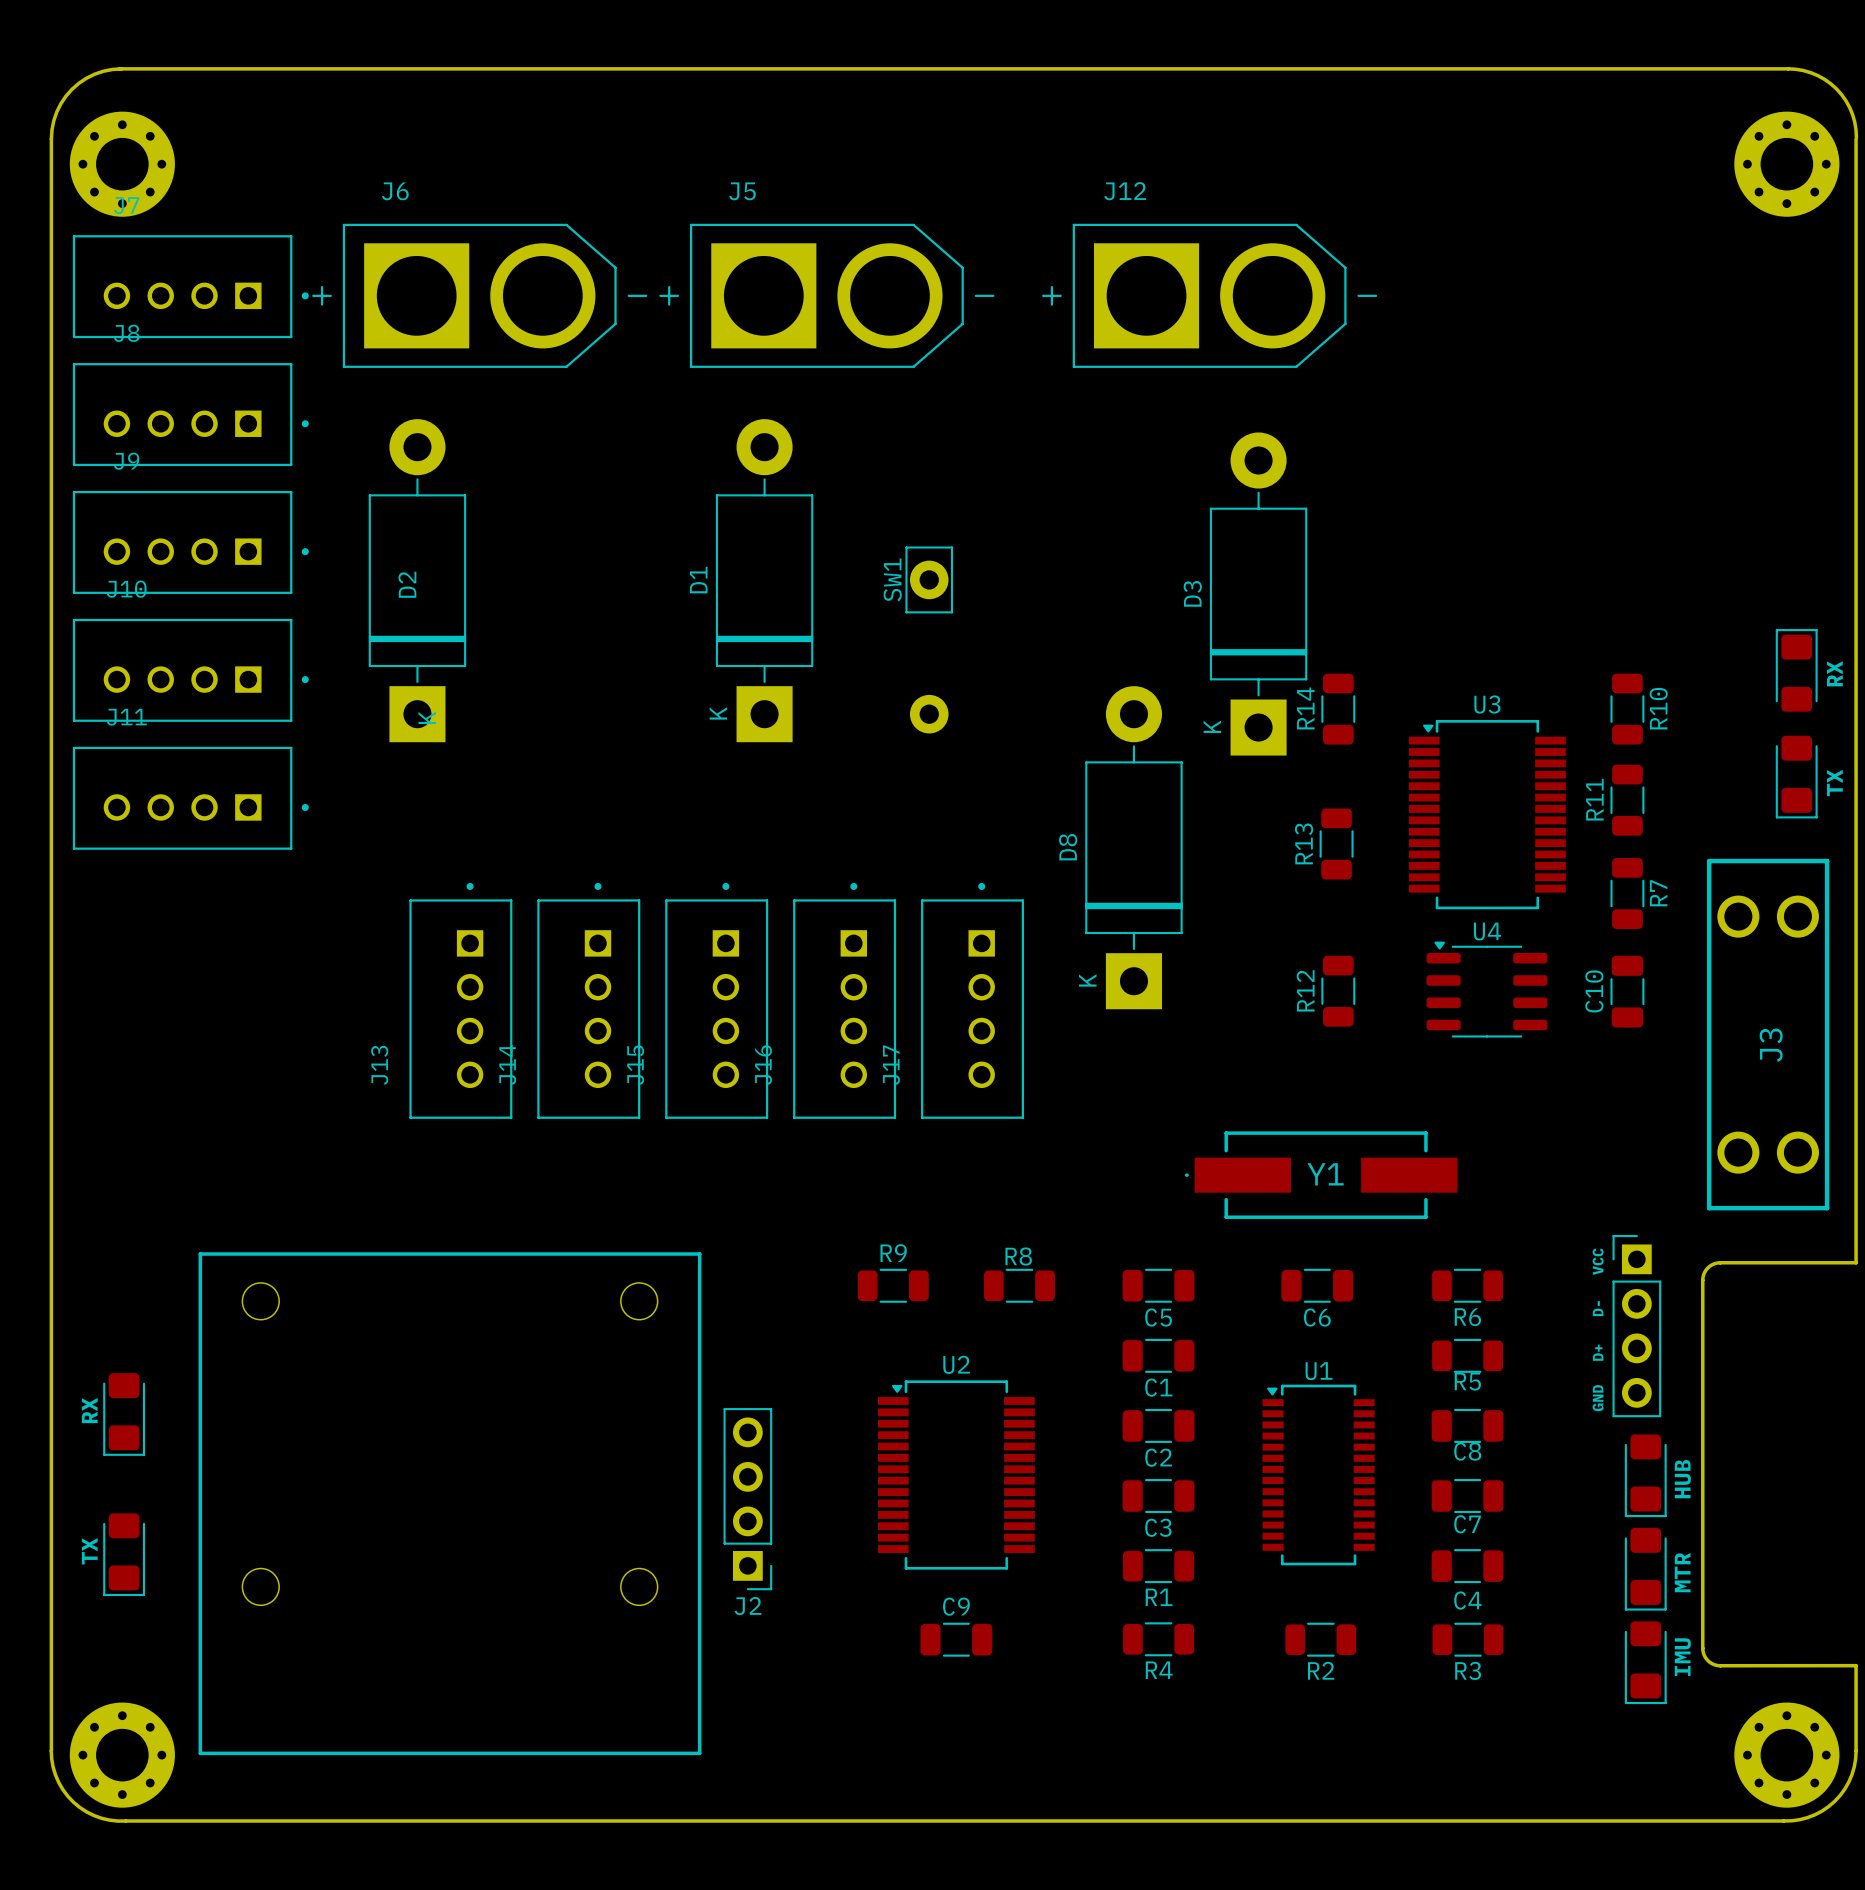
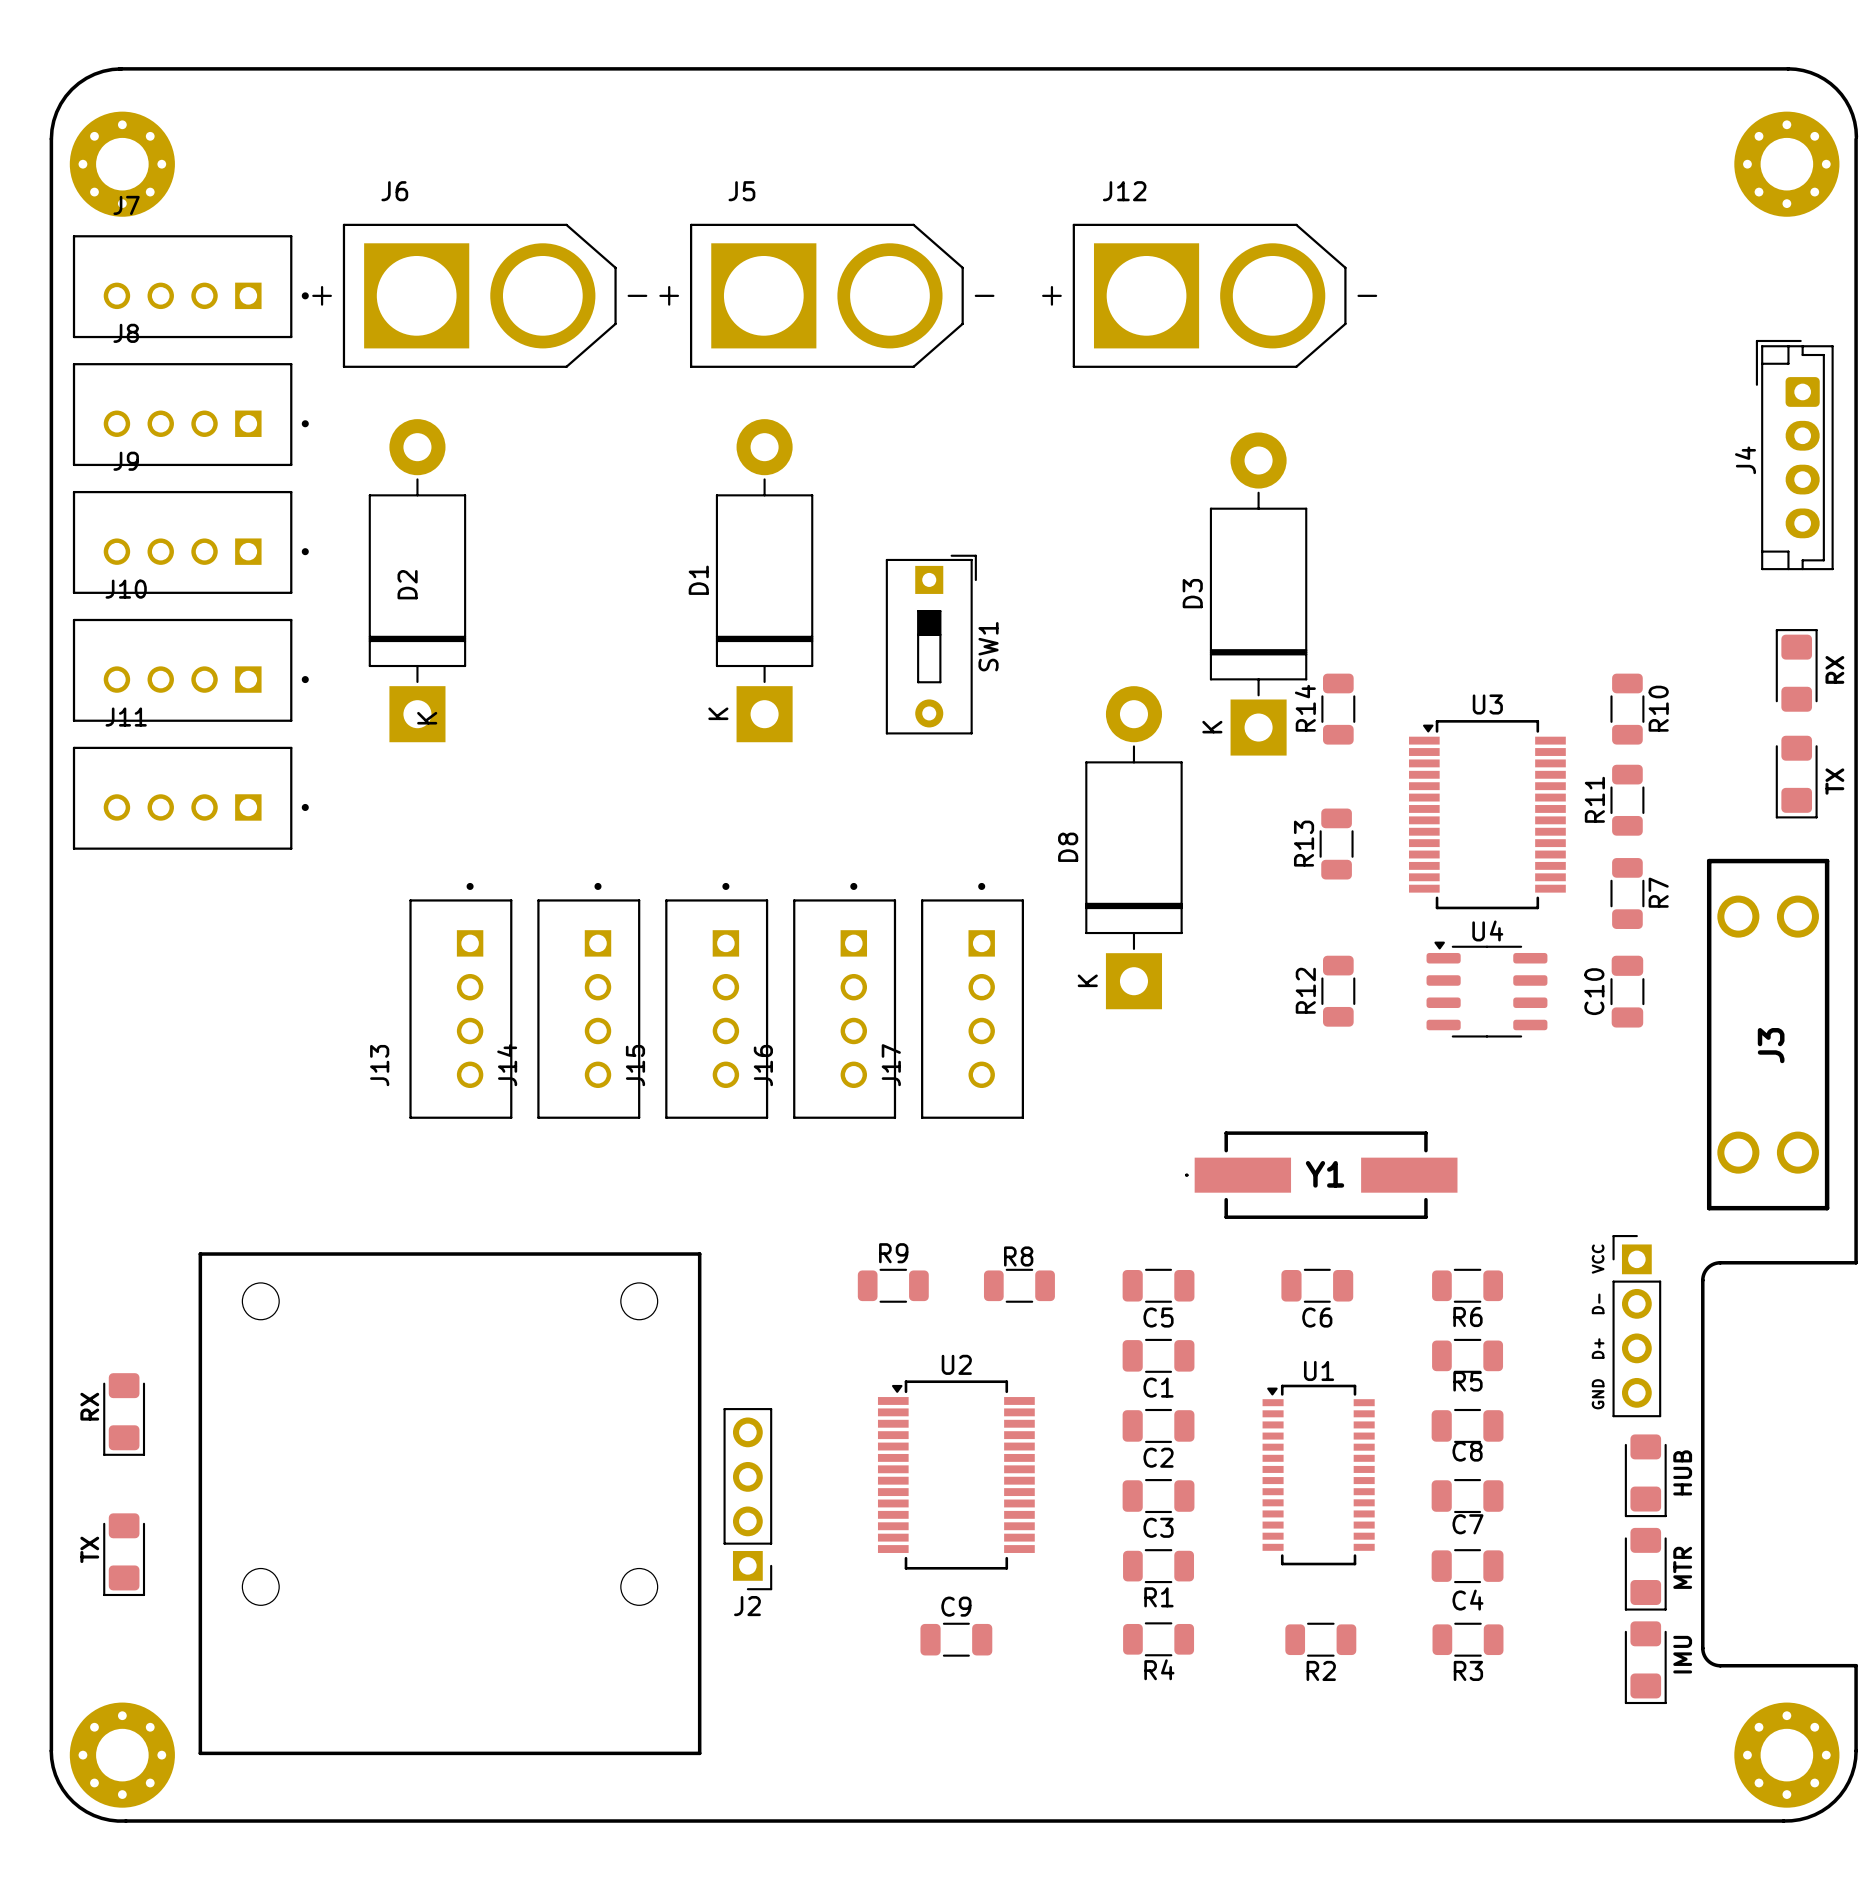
J4: none -> (1794, 455)
SW1 footprint: [905, 546, 954, 614] -> [885, 554, 977, 735]
SW1 name position: SW1 (892, 579) -> SW1 (988, 646)
part: (929, 714) -> none

